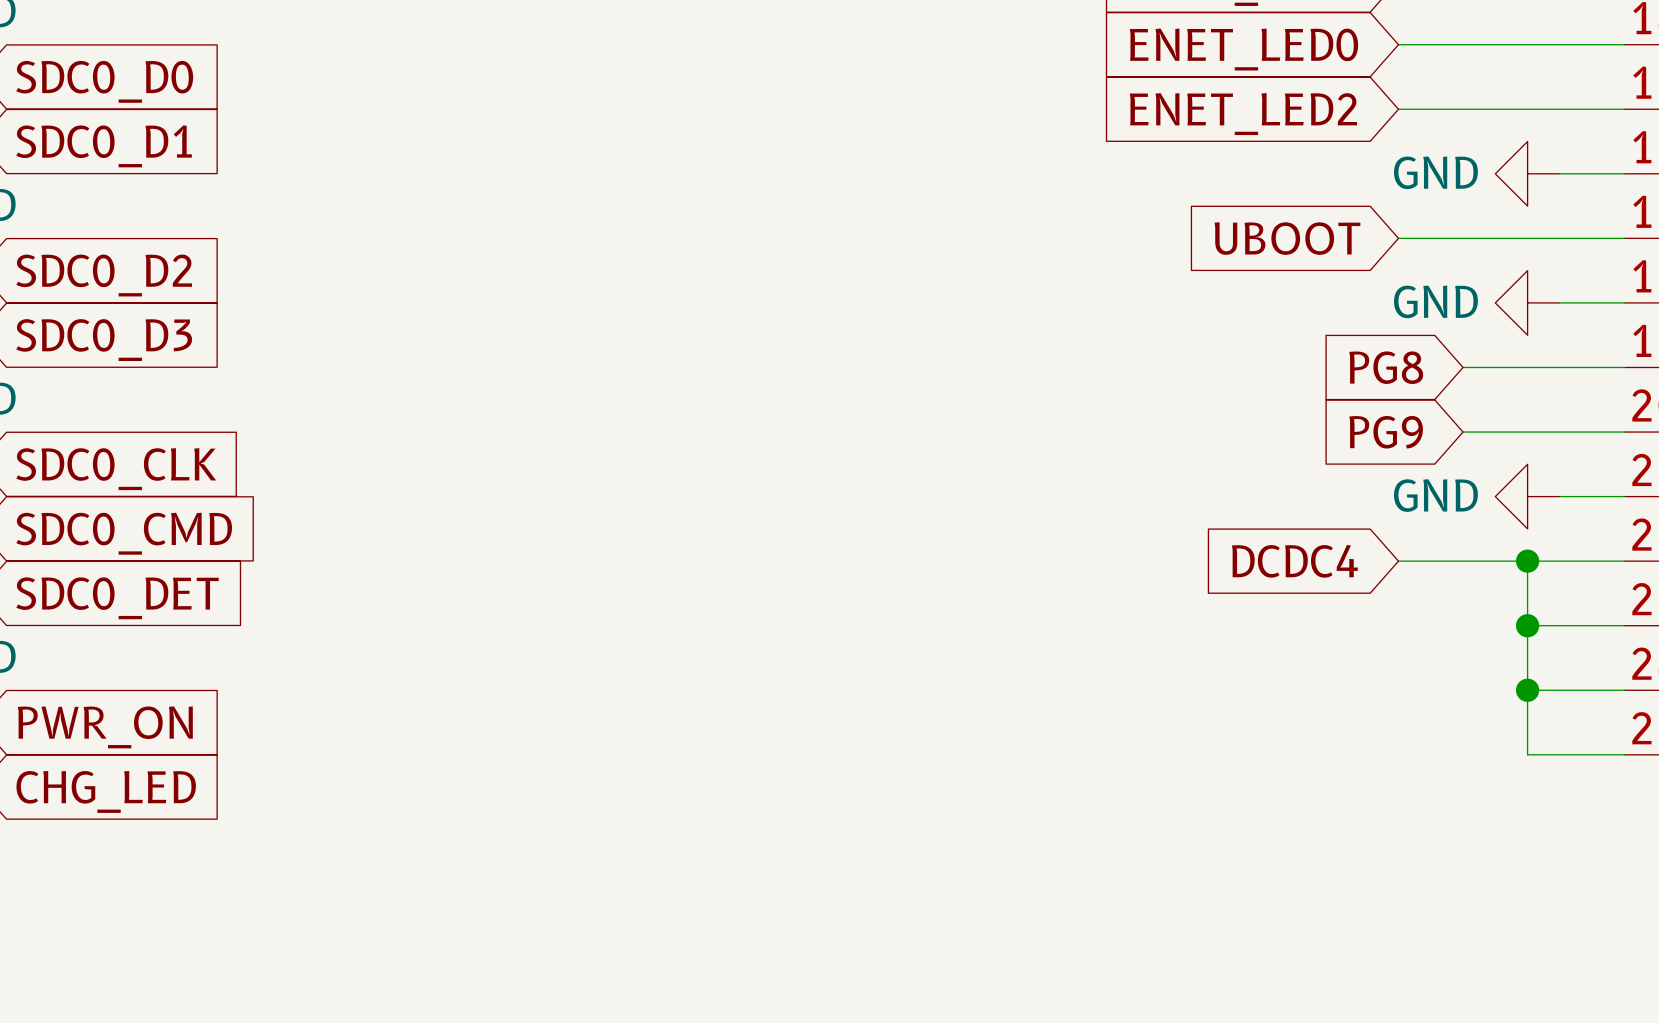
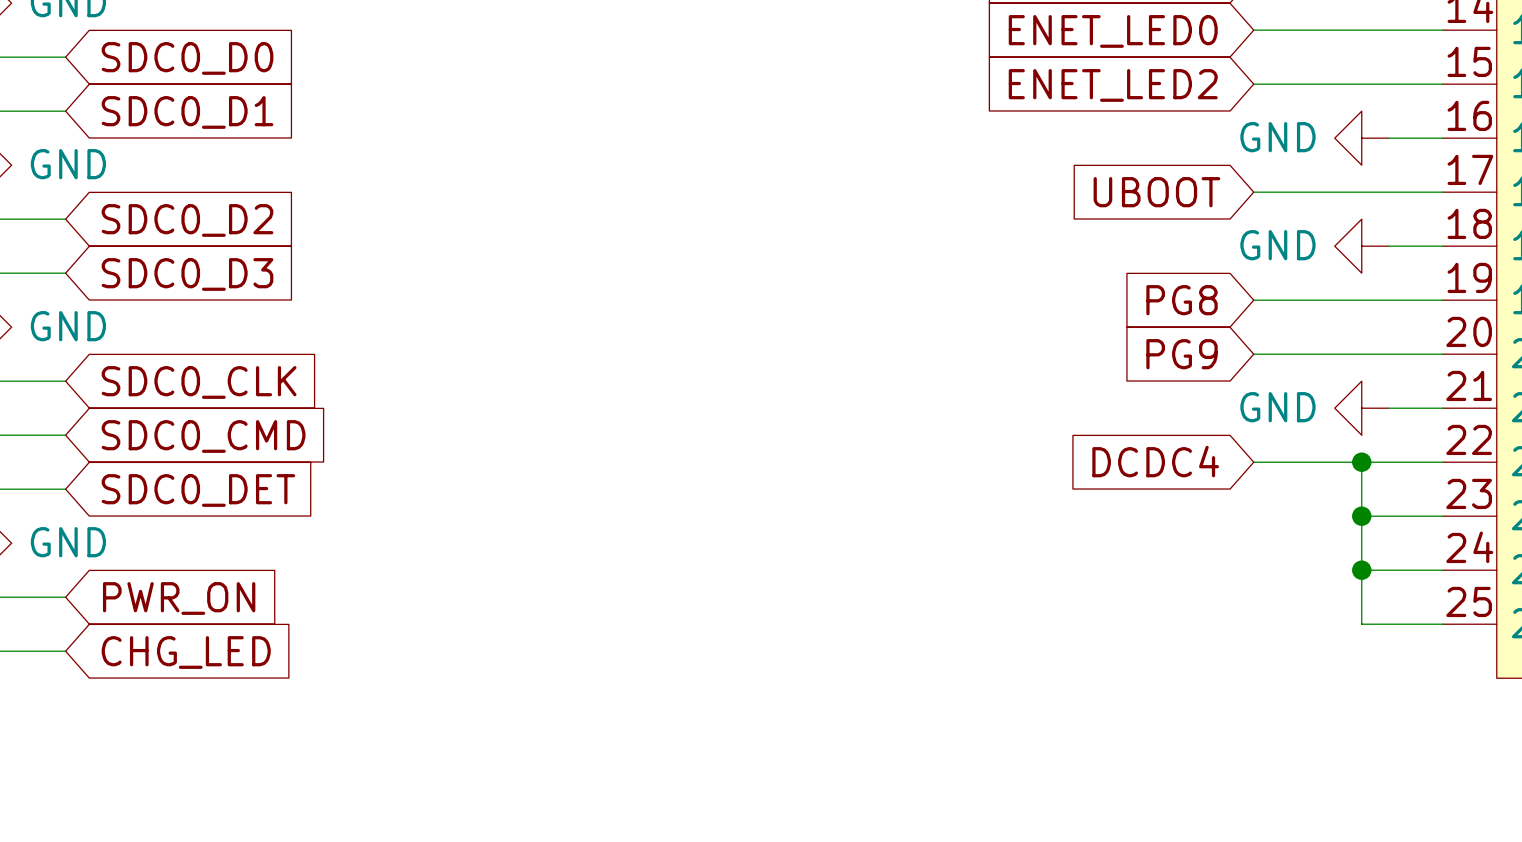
global label position: PG8 (1386, 367) -> PG8 (1182, 300)
wire: none -> (1253, 300) (1307, 300)
global label position: PG9 (1386, 432) -> PG9 (1182, 354)
wire: none -> (1253, 354) (1307, 354)

